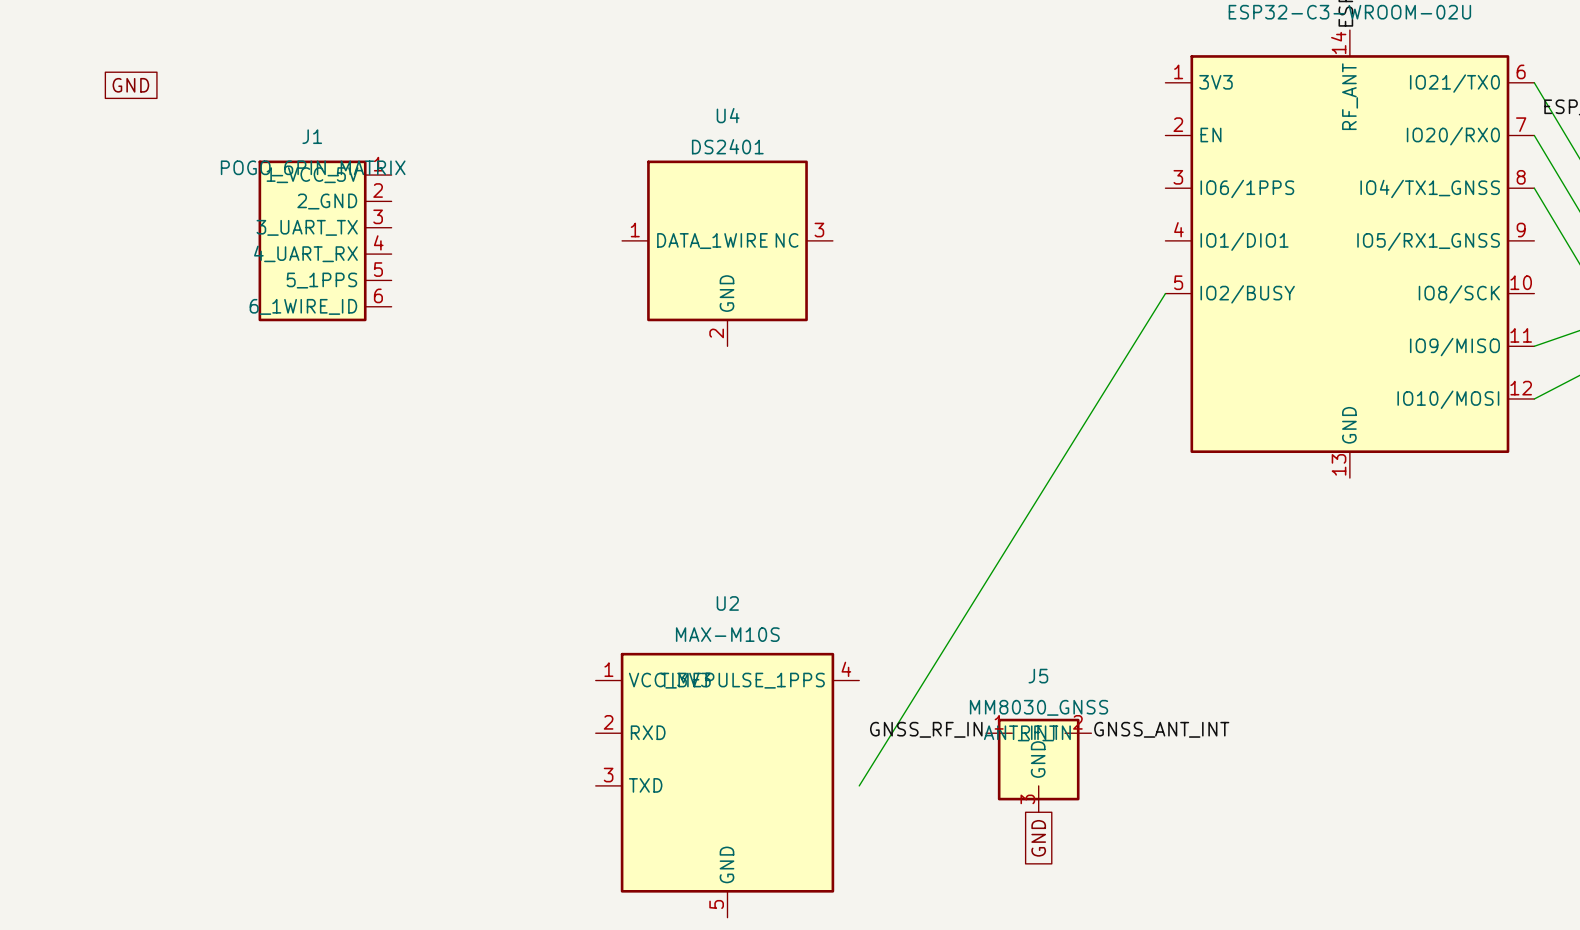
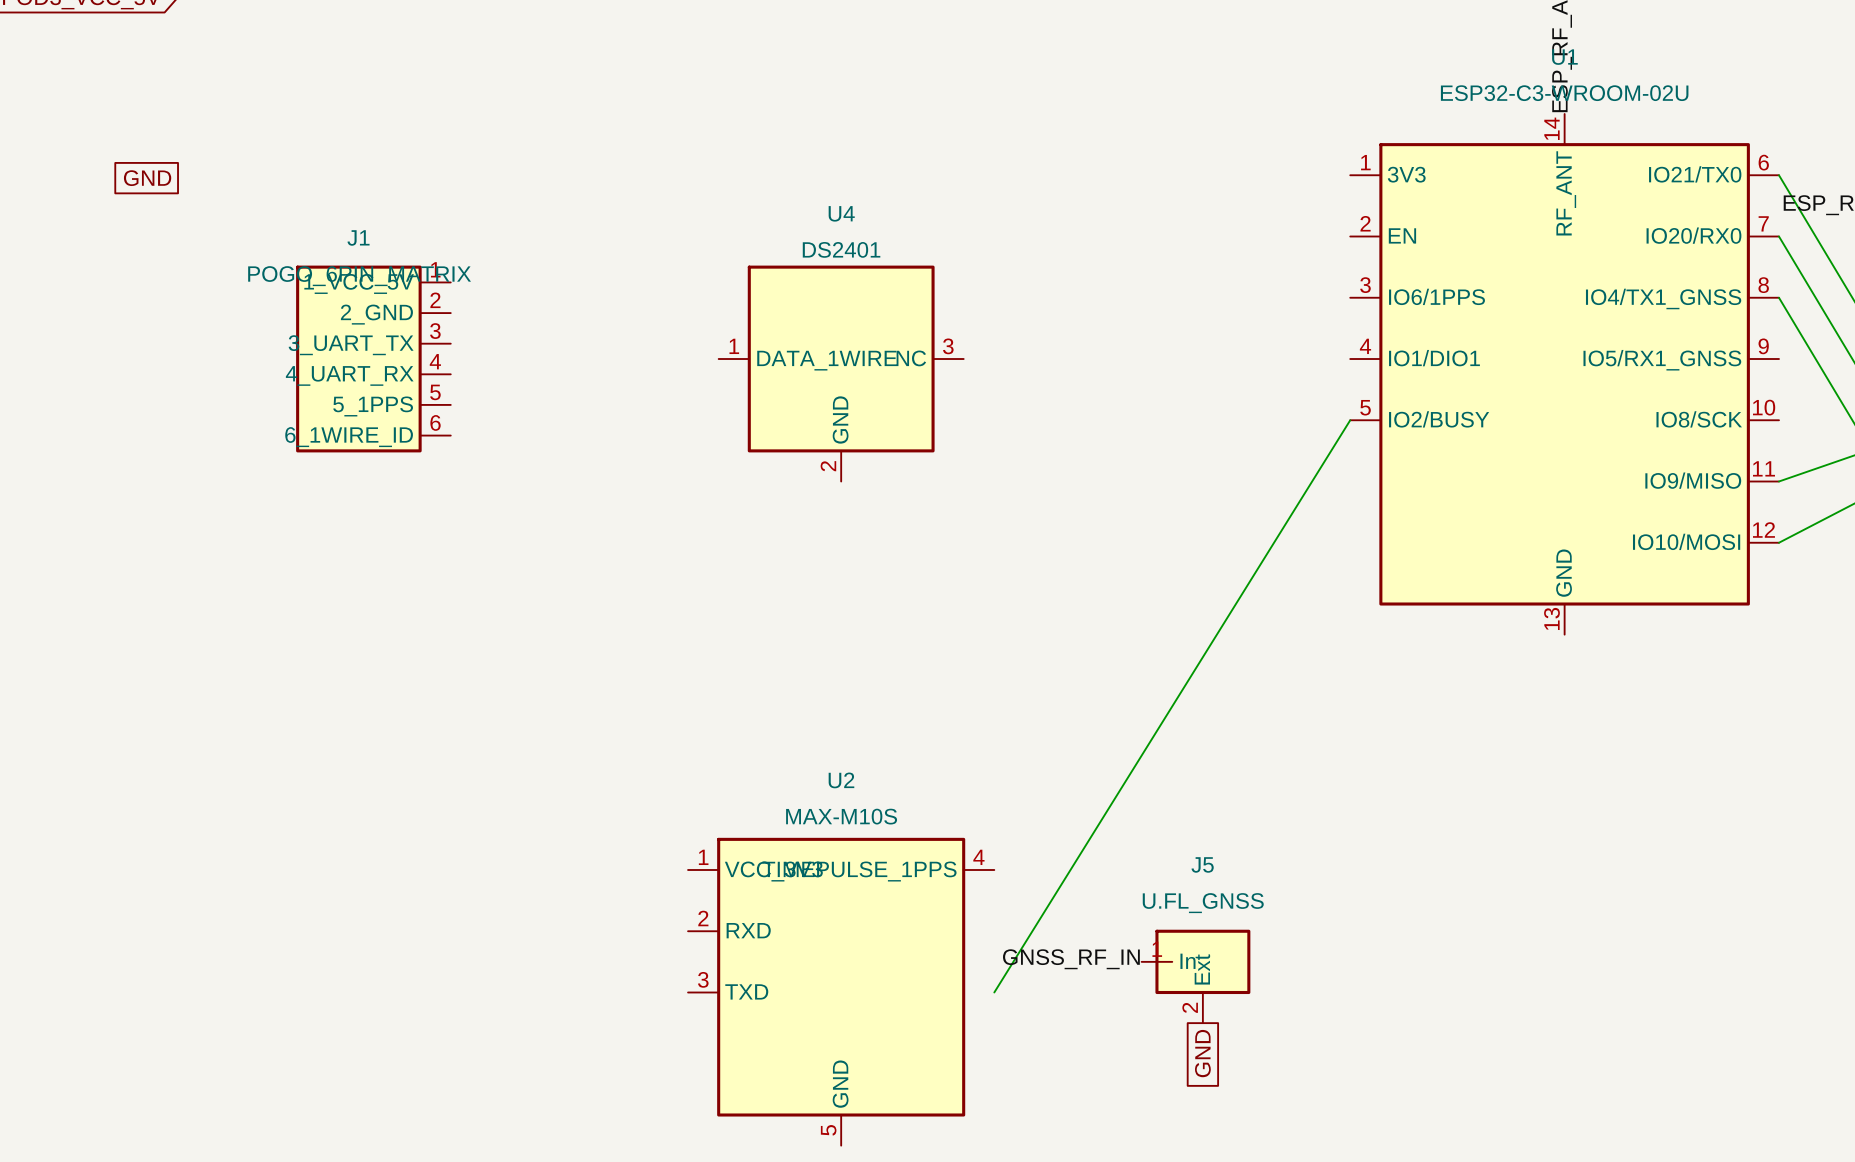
J5 value: MM8030_GNSS (1039, 707) -> U.FL_GNSS (1203, 903)
J5 symbol: [986, 718, 1092, 813] -> [1141, 929, 1251, 1024]
label position: GNSS_RF_IN (926, 729) -> GNSS_RF_IN (1071, 959)
label: GNSS_ANT_INT (1161, 729) -> none

